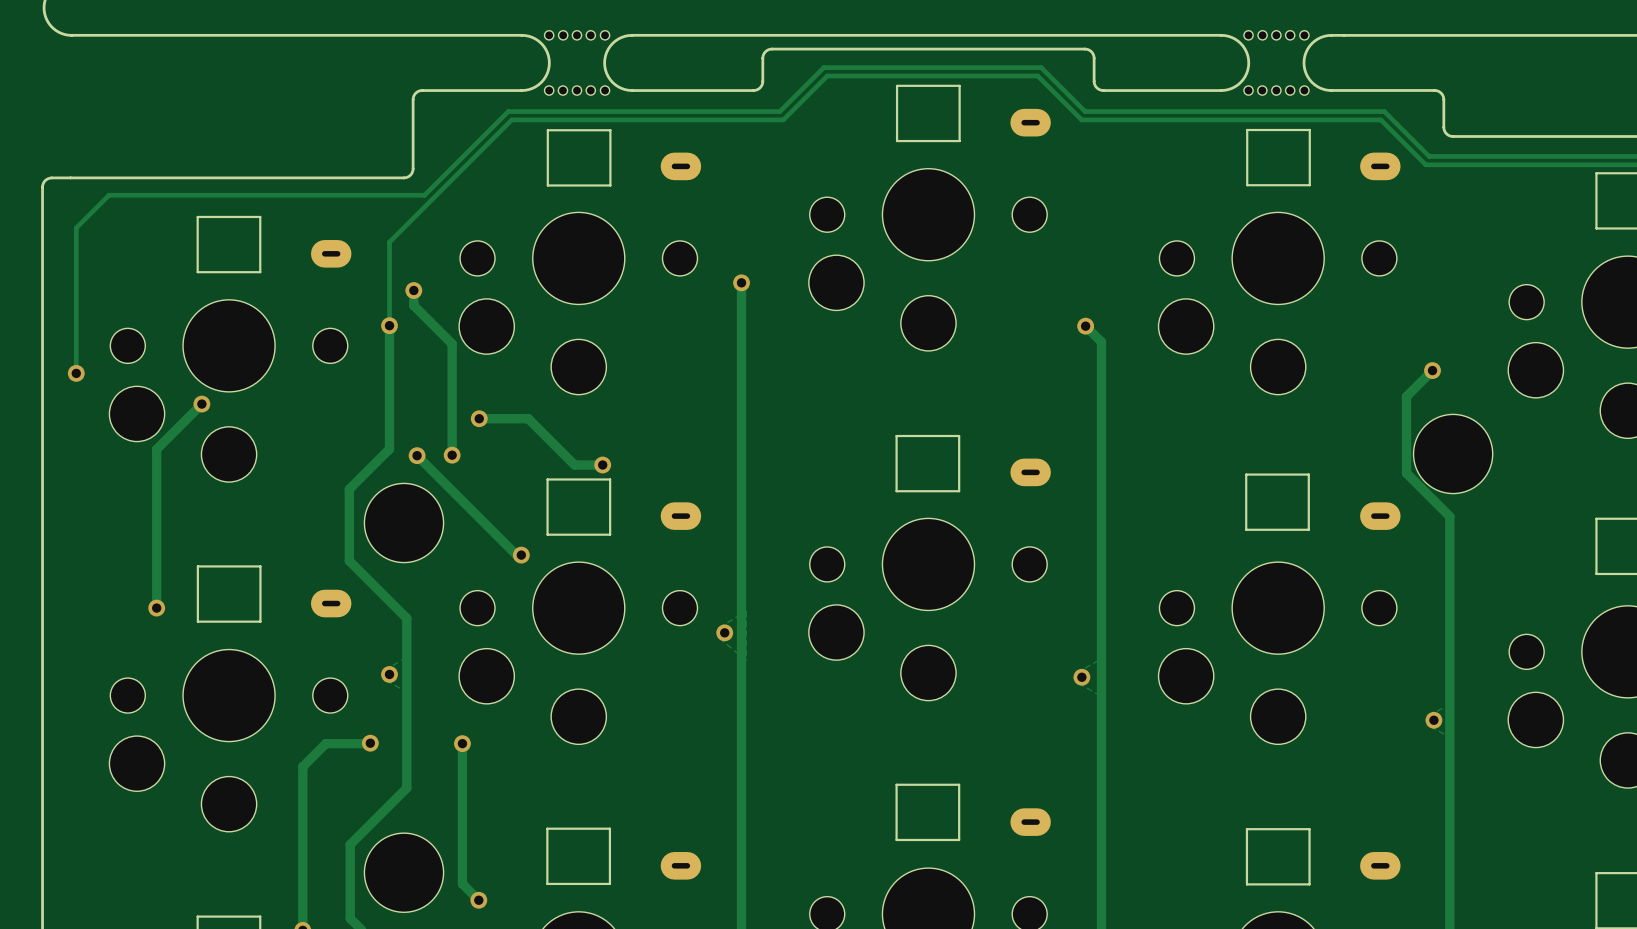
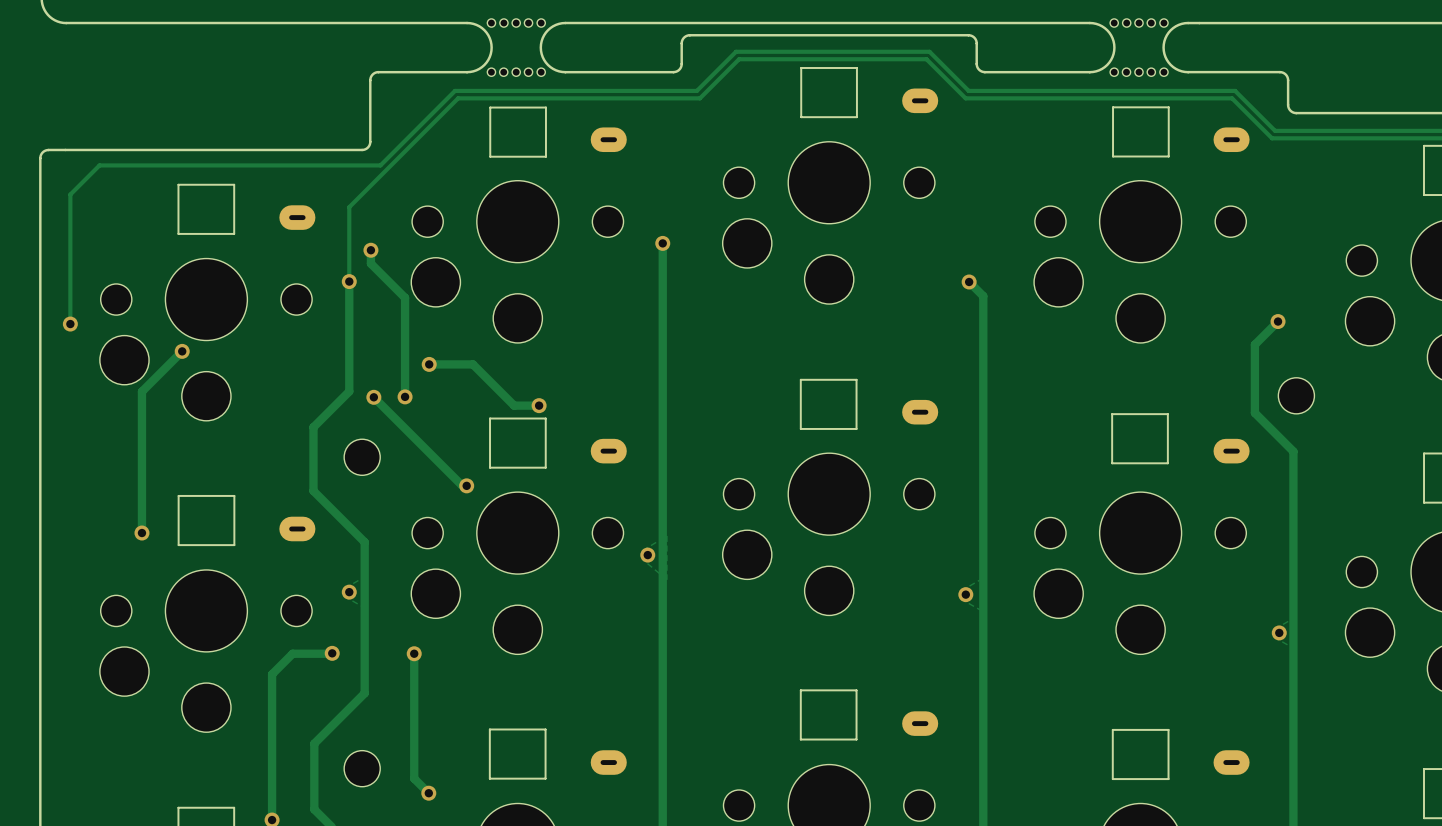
part footprint: [1413, 414, 1493, 494] -> [1278, 377, 1315, 414]
part footprint: [364, 483, 444, 563] -> [344, 439, 381, 476]
part footprint: [364, 833, 444, 913] -> [344, 750, 381, 787]

